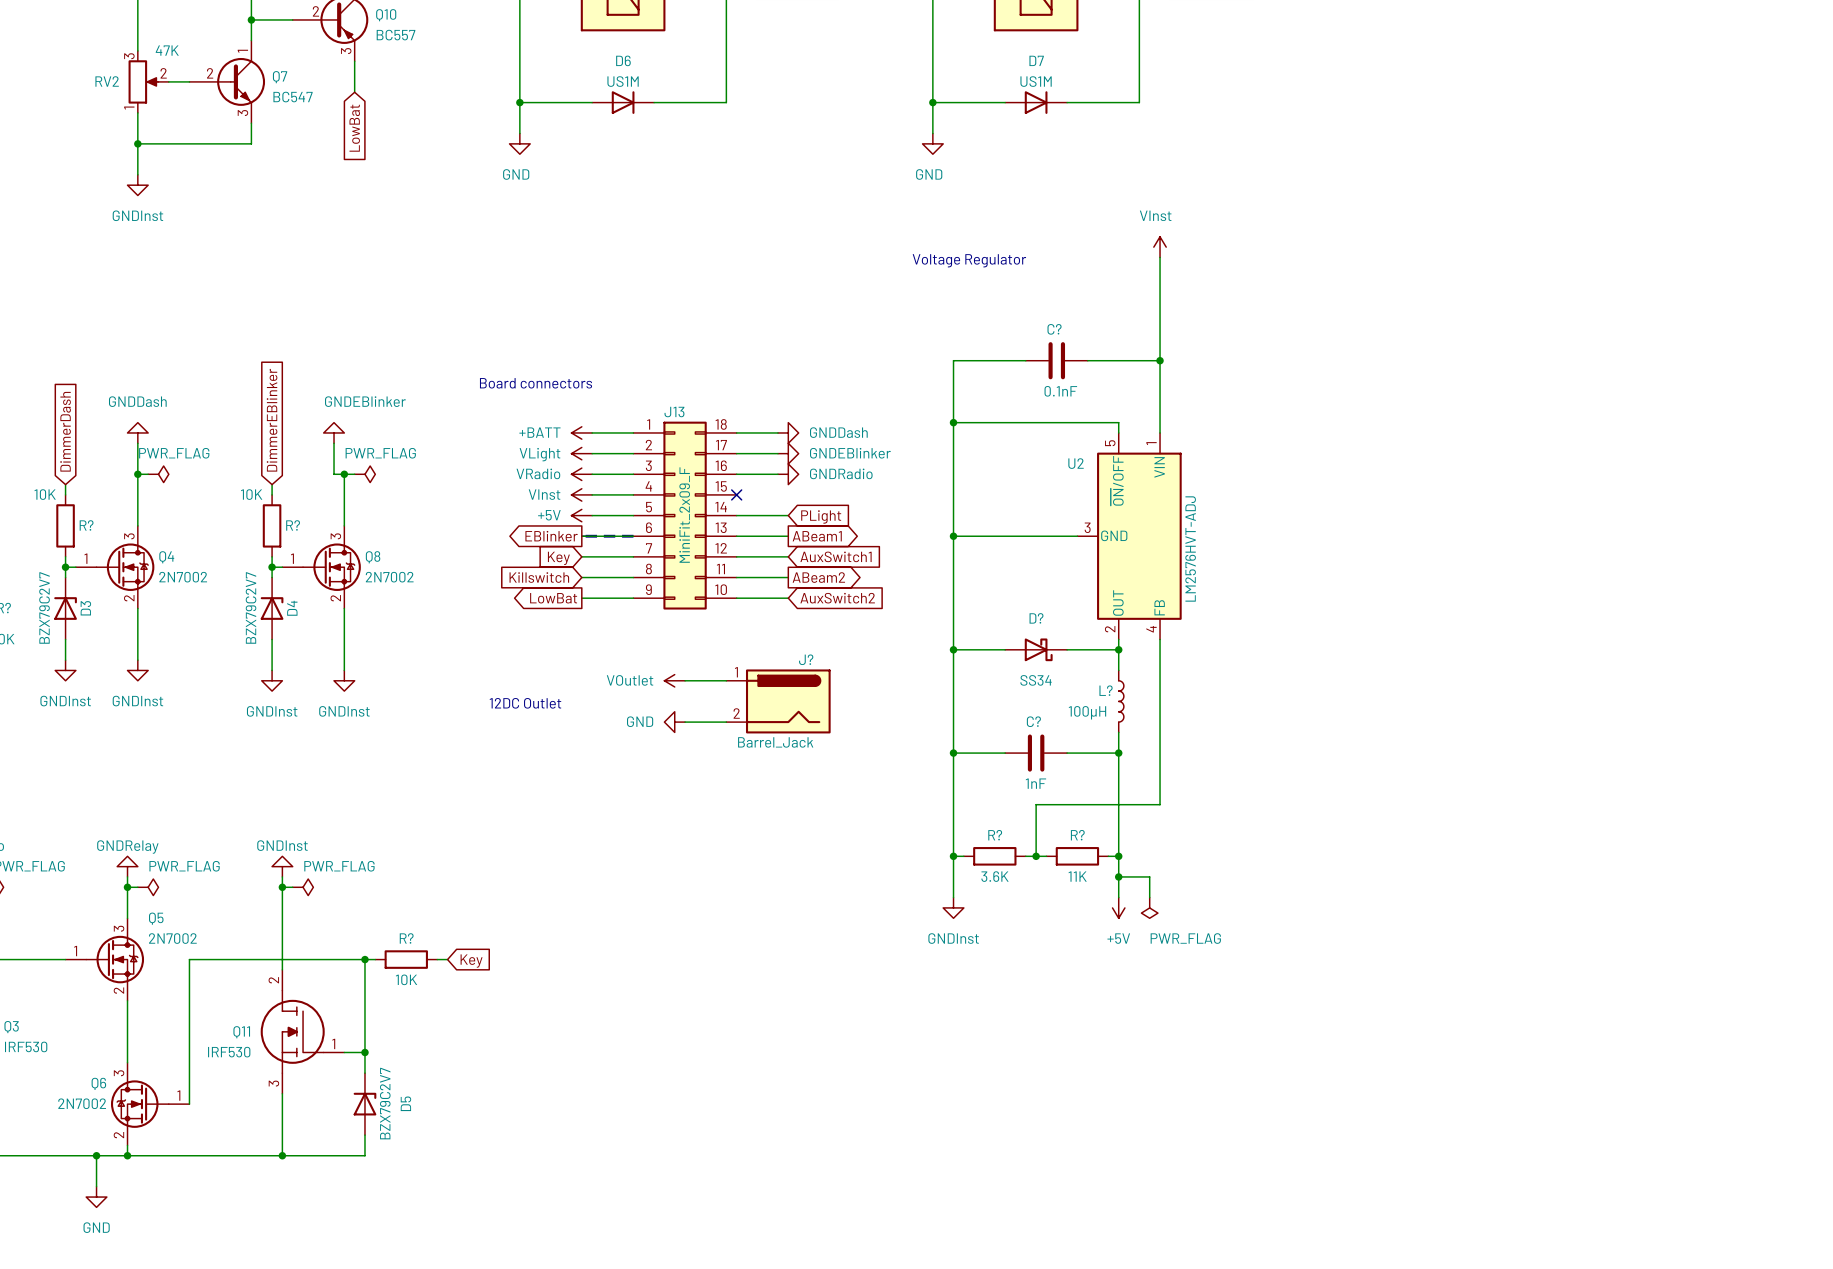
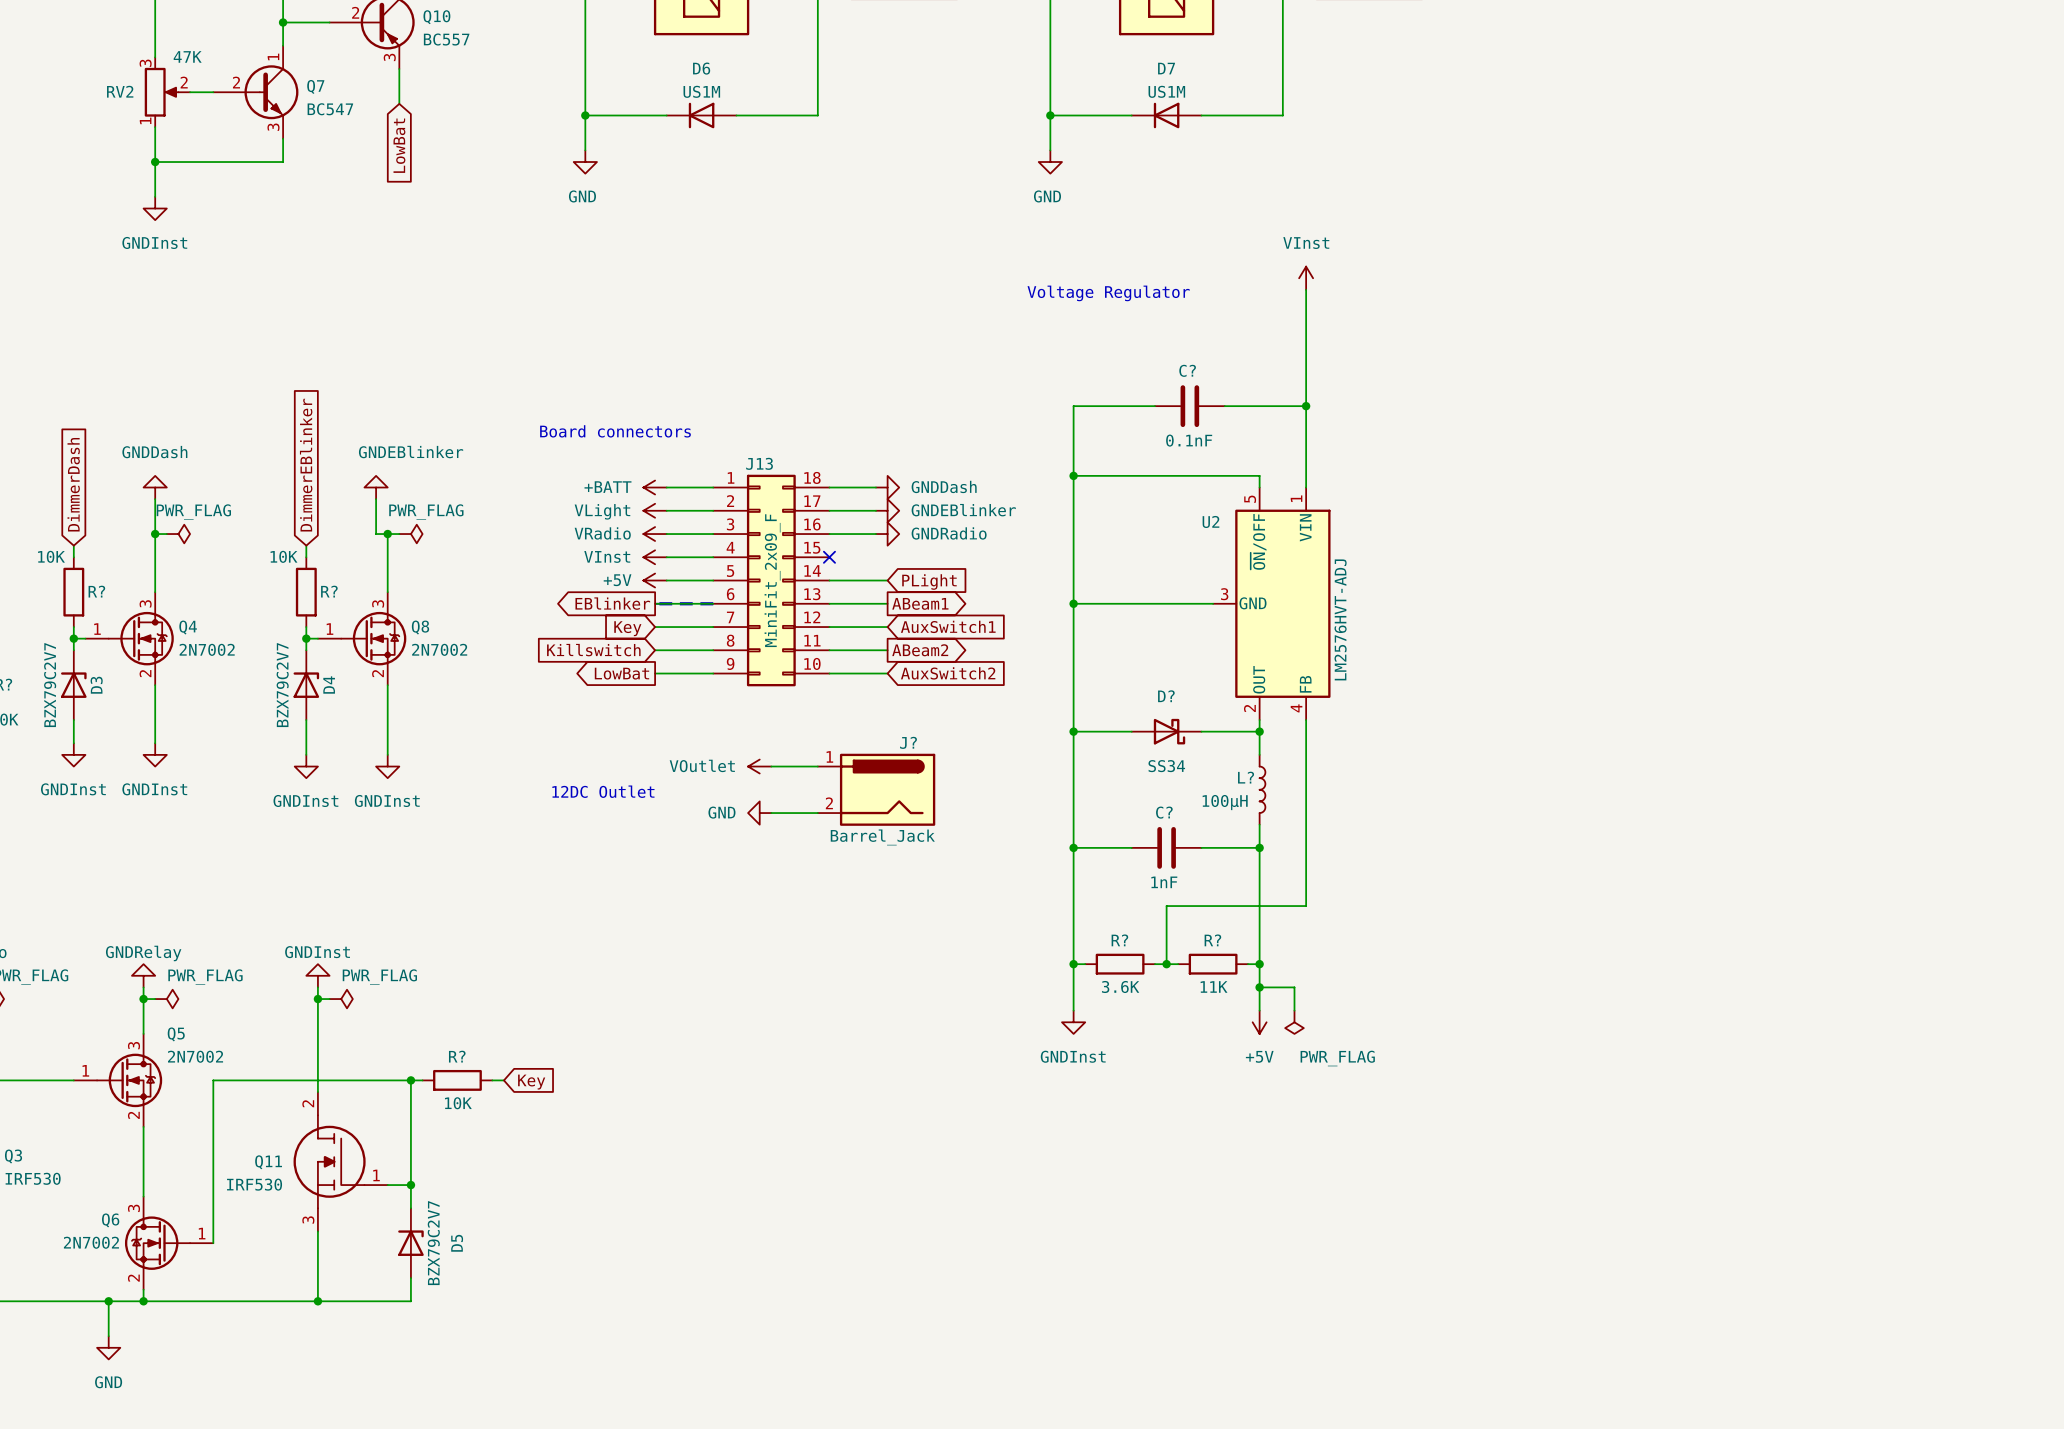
D6 rotation: 0° (623, 102) -> 180° (701, 115)
D7 rotation: 0° (1036, 102) -> 180° (1166, 115)

